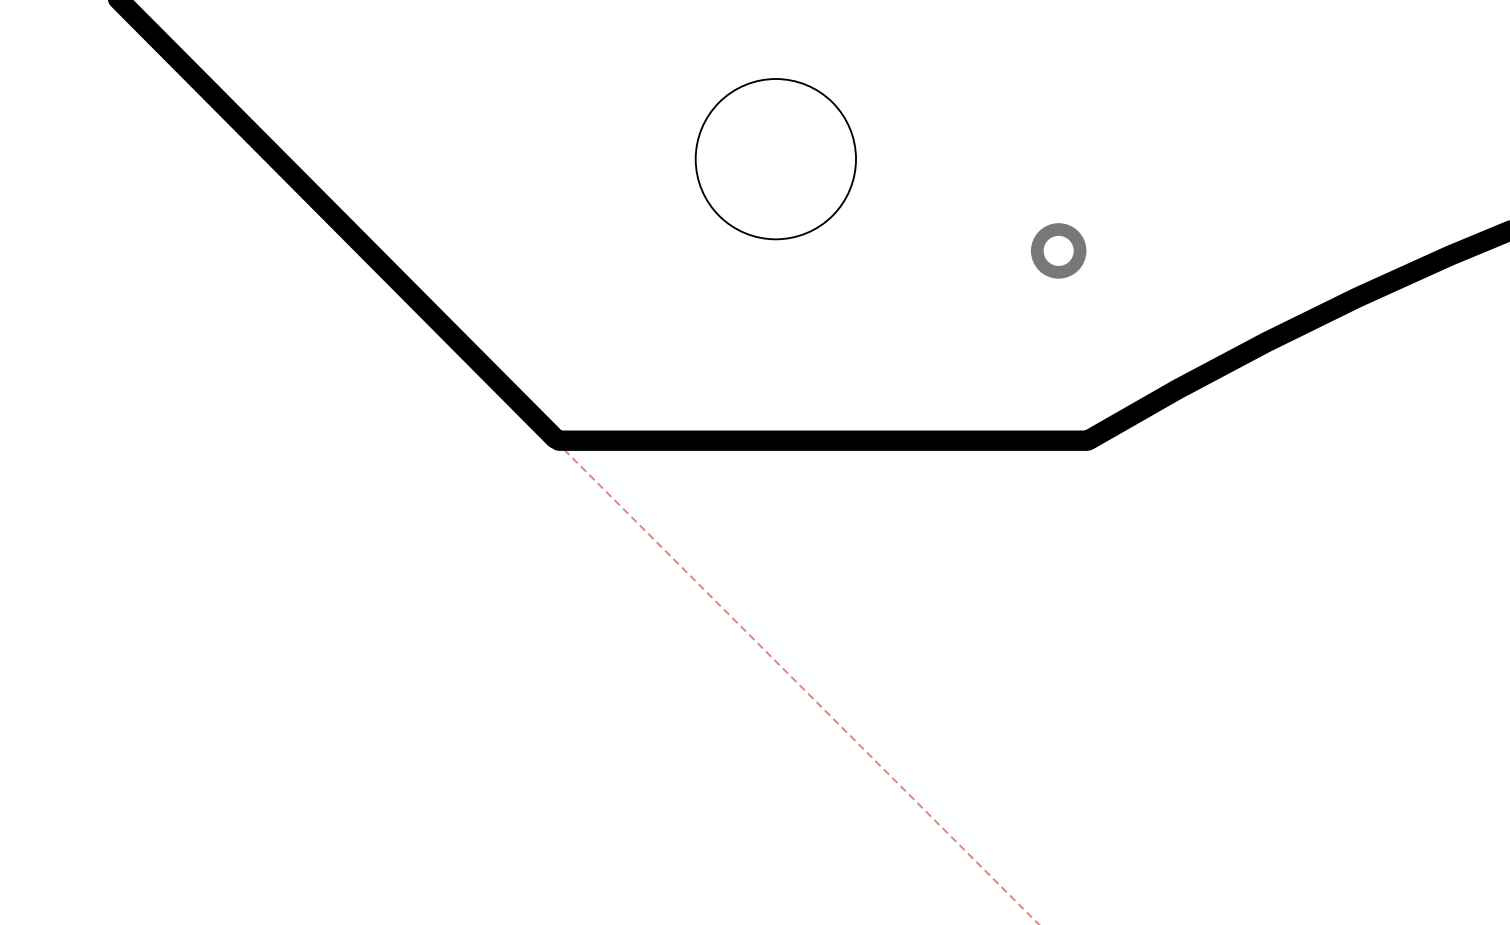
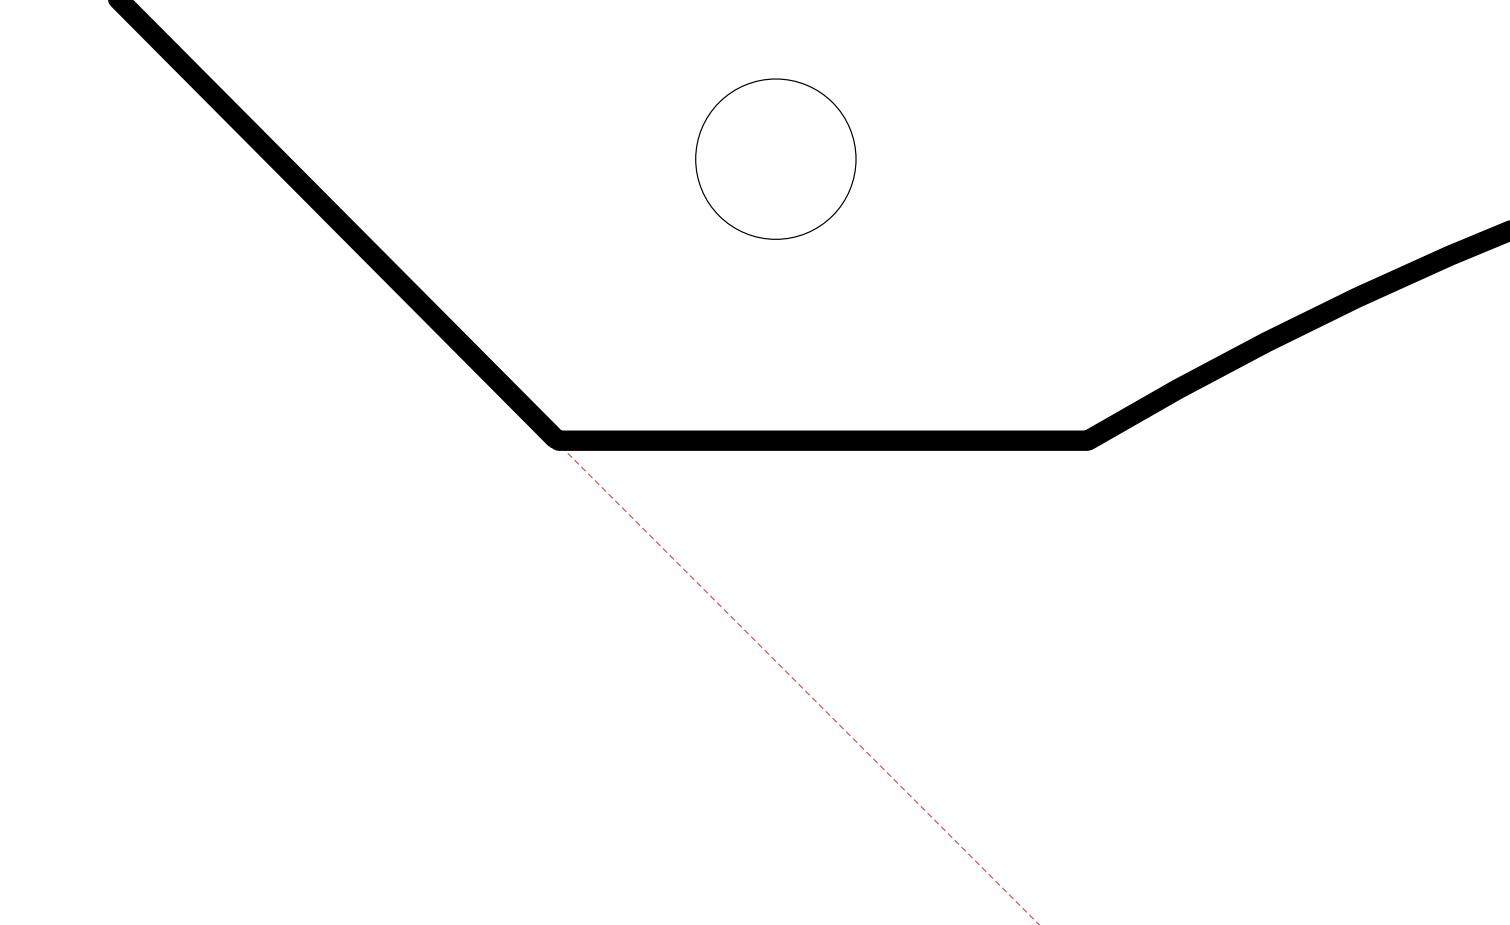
via: (1058, 250) -> none

